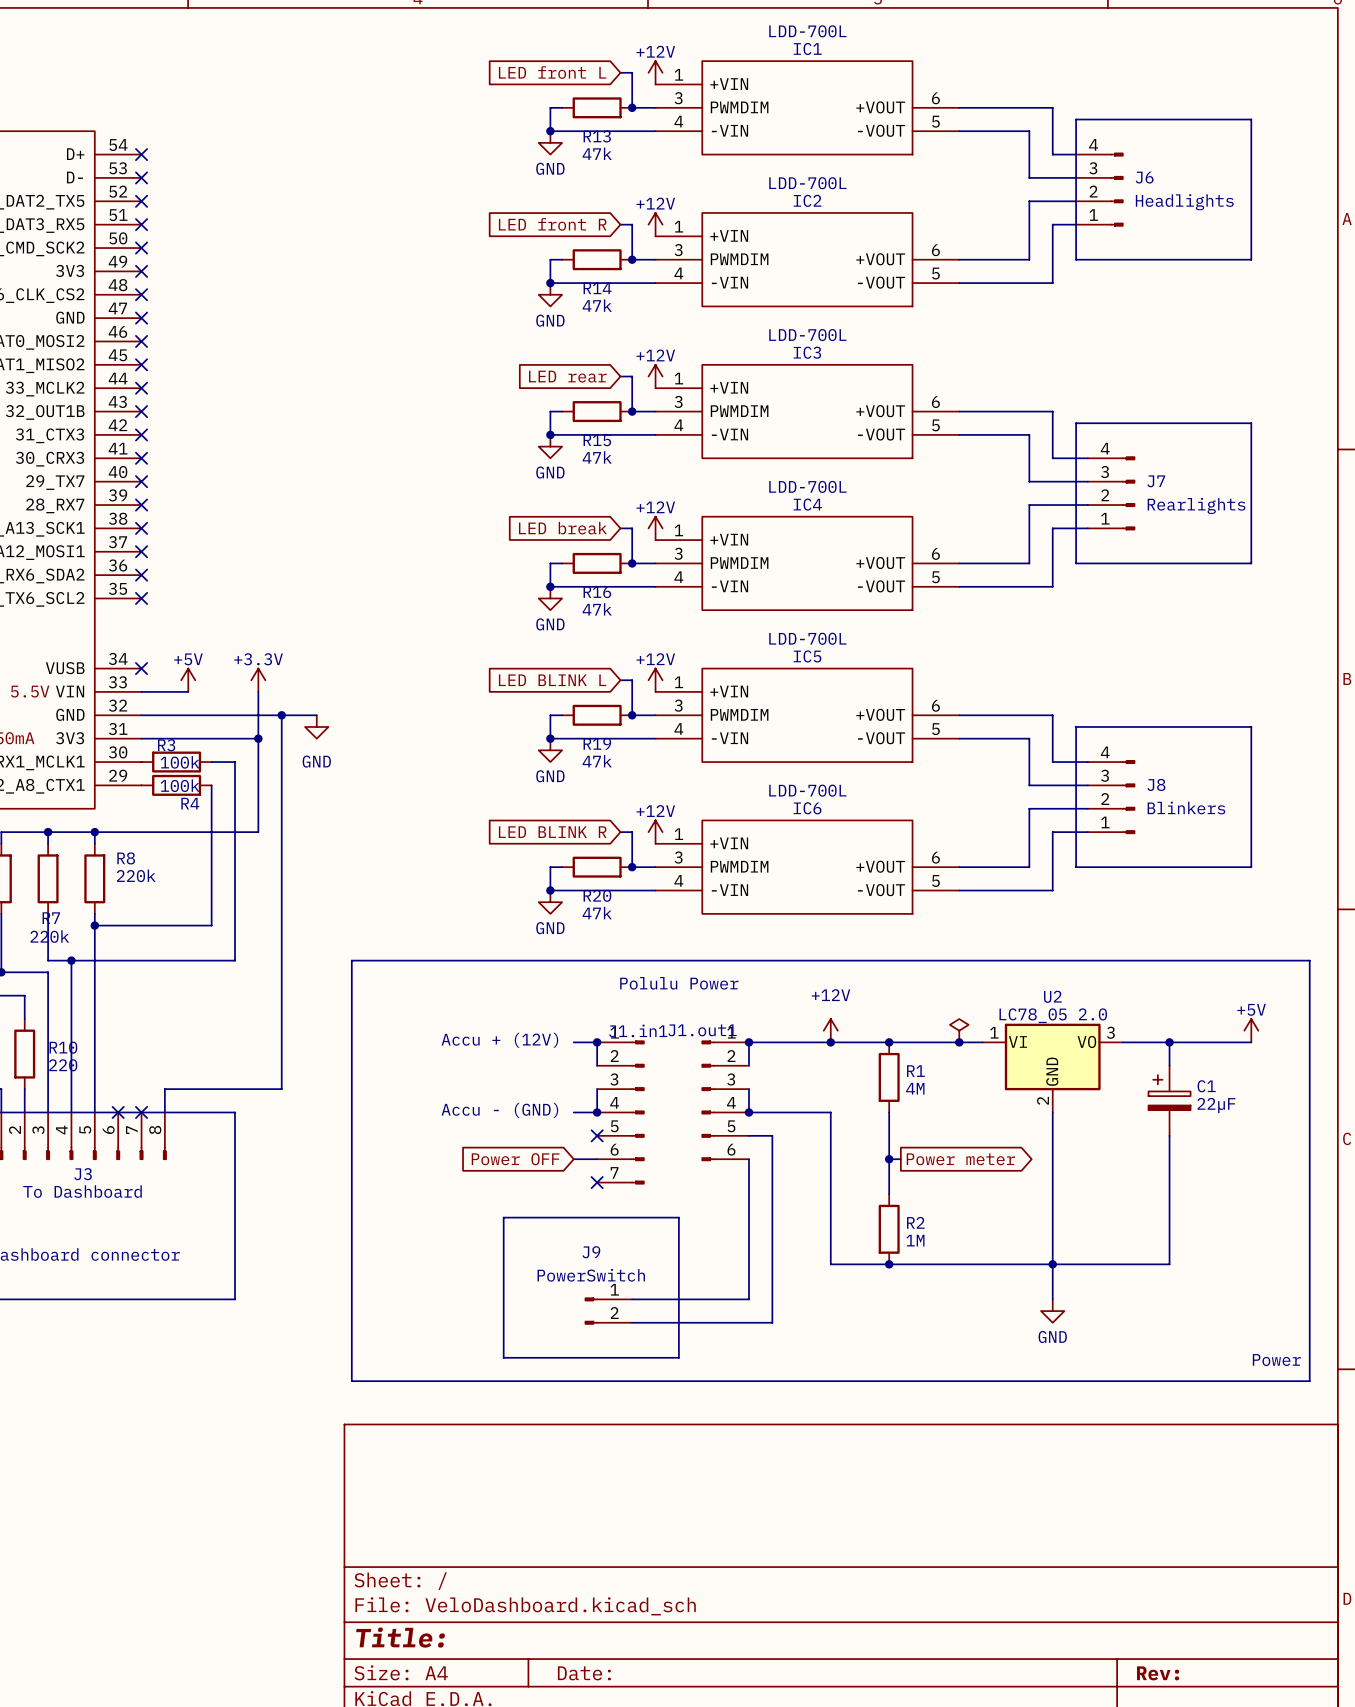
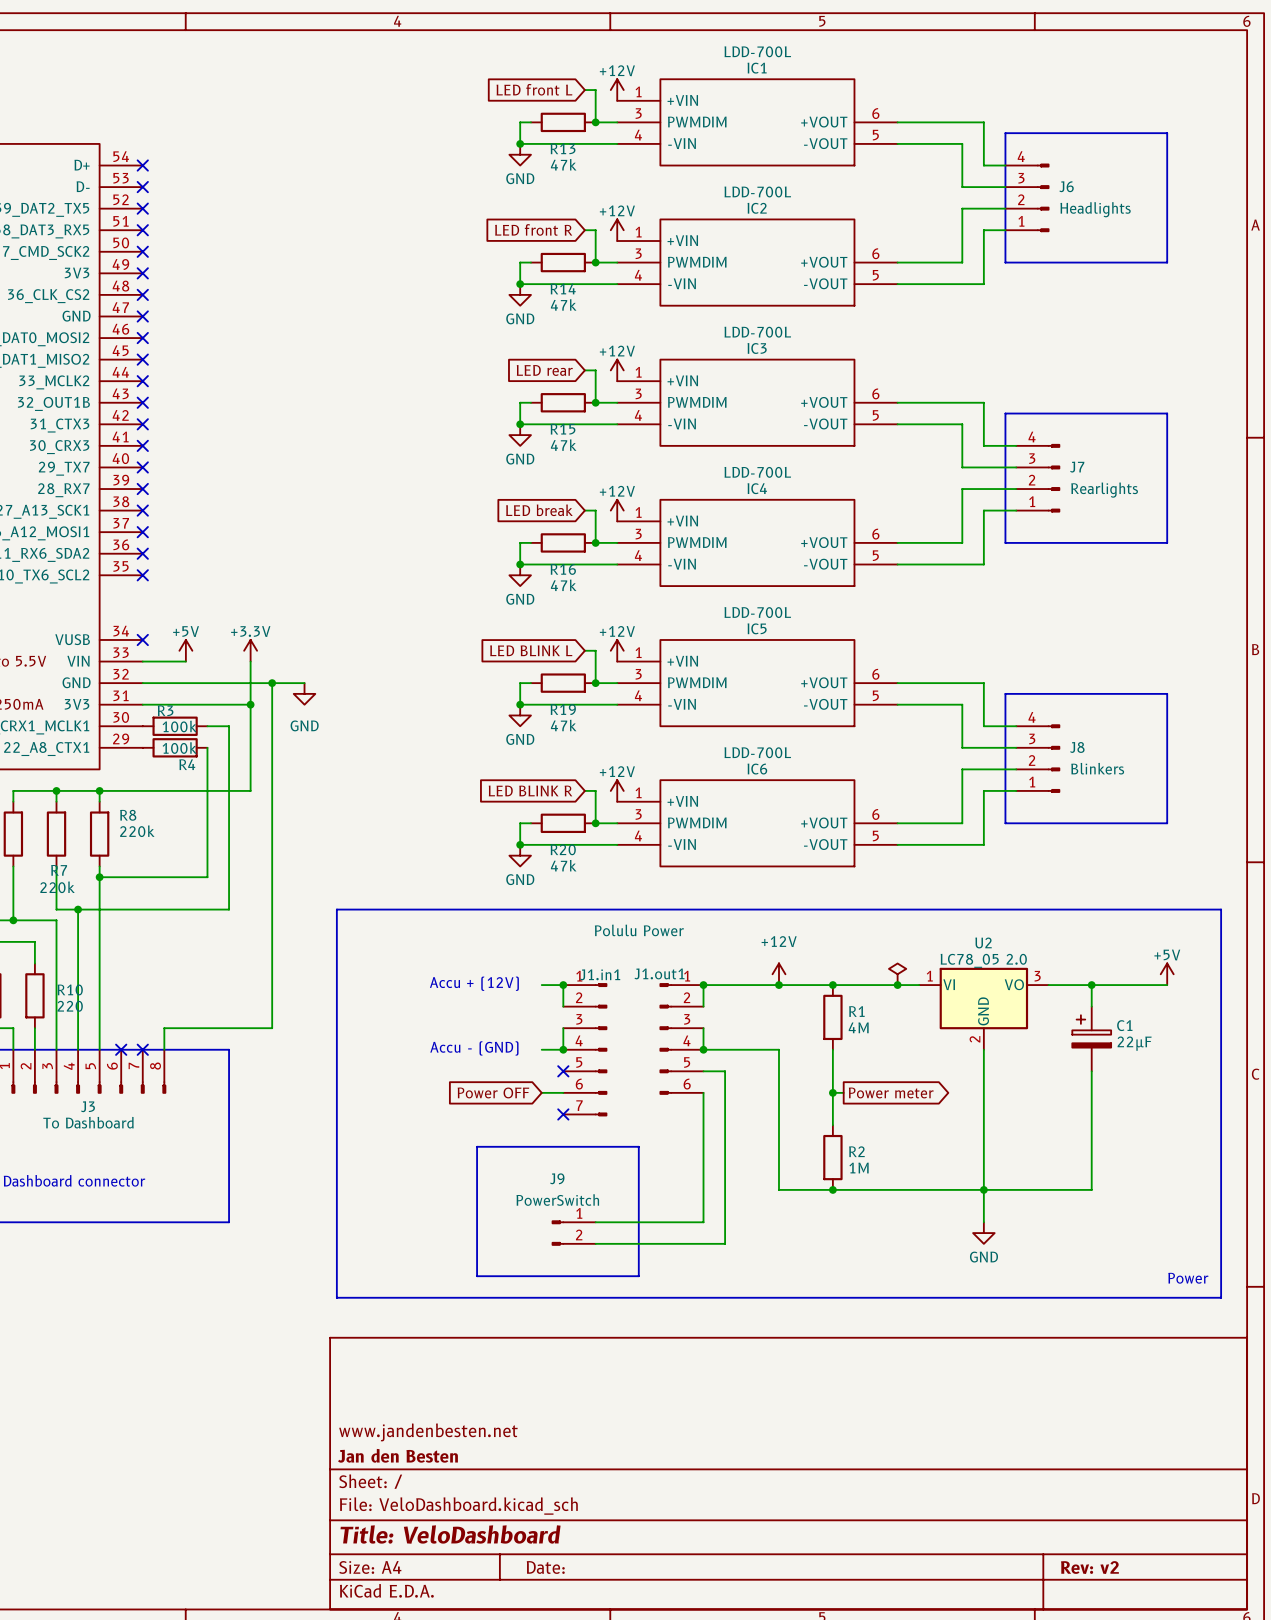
title block: none -> www.jandenbesten.net (428, 1432)
title block: none -> Jan den Besten (397, 1455)
title block: Title: (400, 1637) -> Title: VeloDashboard (450, 1534)
title block: Rev: (1158, 1673) -> Rev: v2 (1089, 1567)

